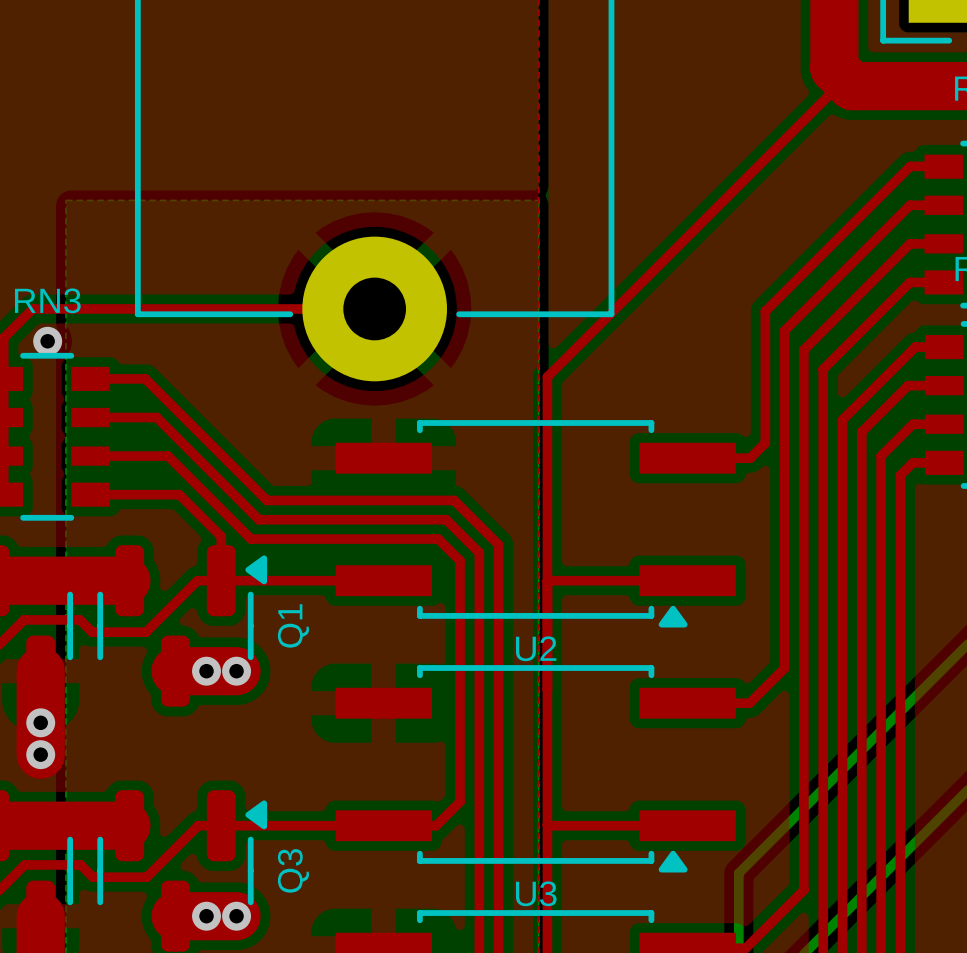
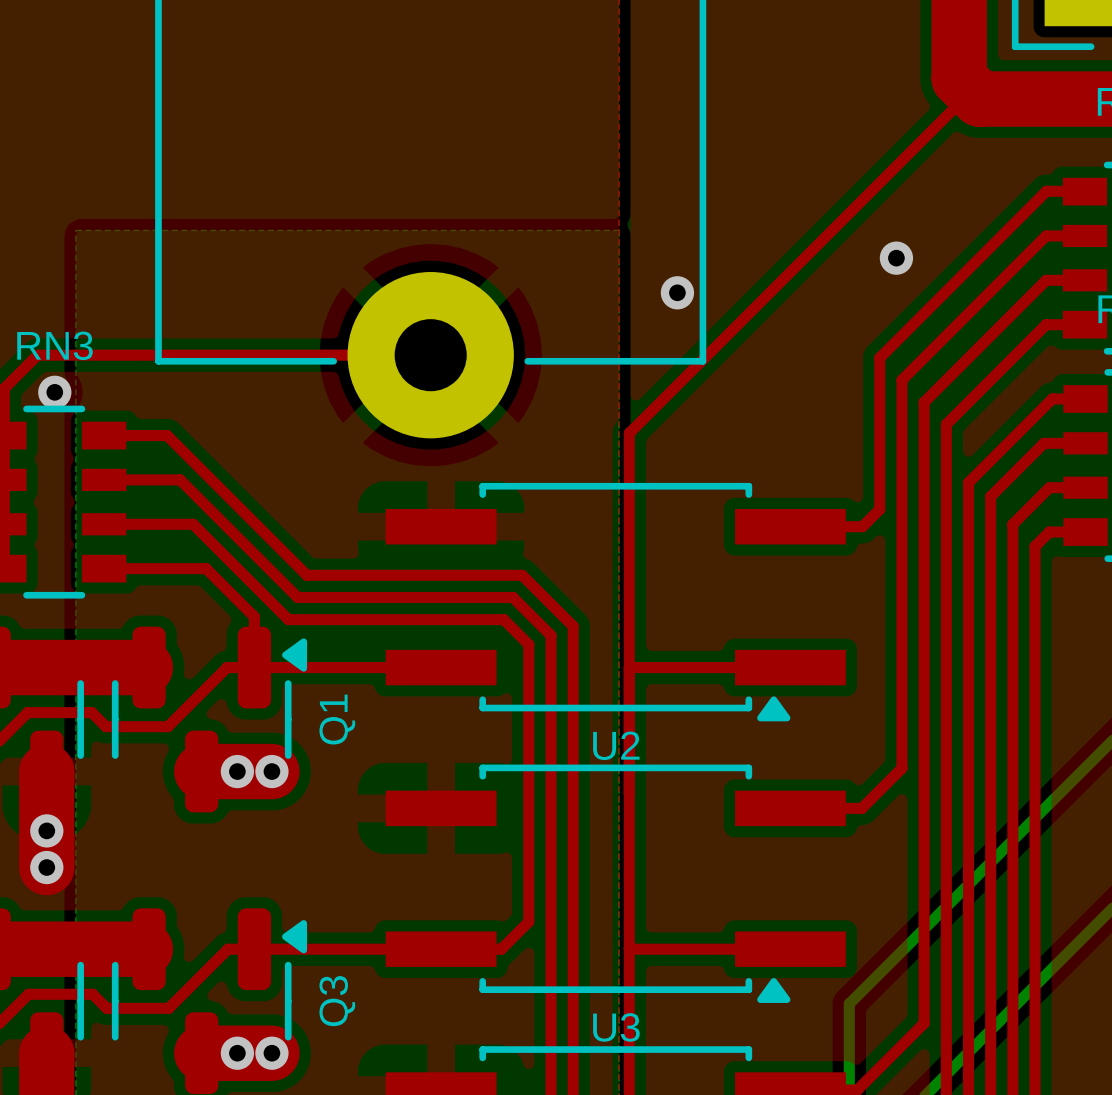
via: none -> (896, 258)
via: none -> (677, 292)

